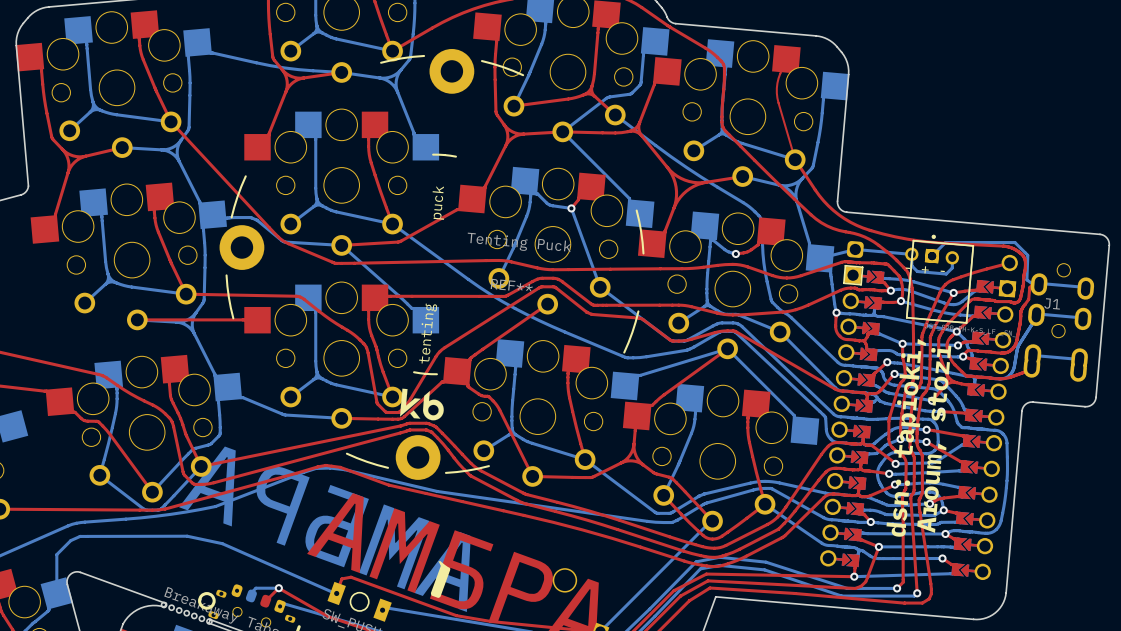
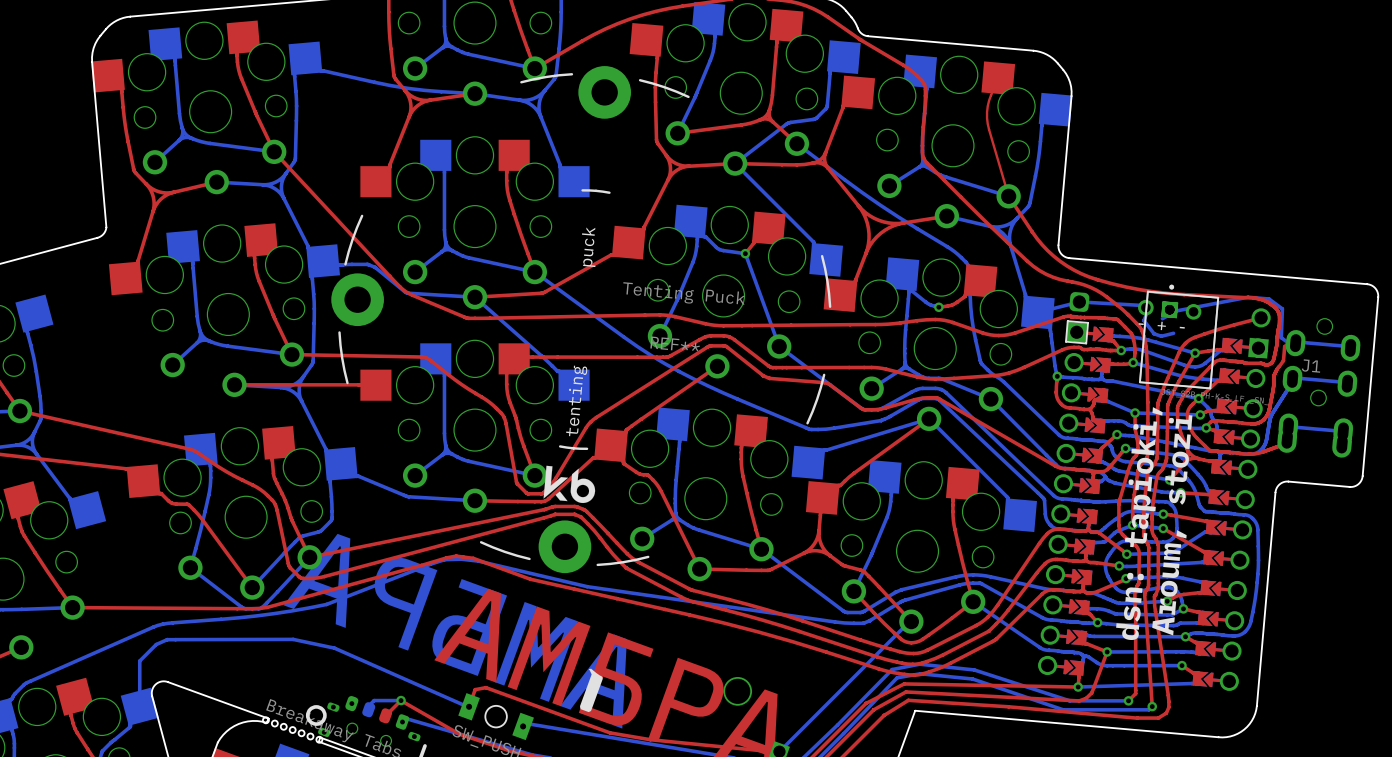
bottom track: (855, 249) (911, 254) -> (1079, 301) (1150, 305) (1143, 320) (1154, 333) (1161, 336) (1173, 333)
bottom track: (911, 254) (911, 265) (917, 271) (946, 274) -> none
bottom track: (1027, 255) (1014, 242) (945, 242) (932, 256) -> (1282, 308) (1269, 299) (1248, 297) (1176, 310) (1162, 318)
bottom track: (952, 257) (952, 267) (946, 273) -> none

